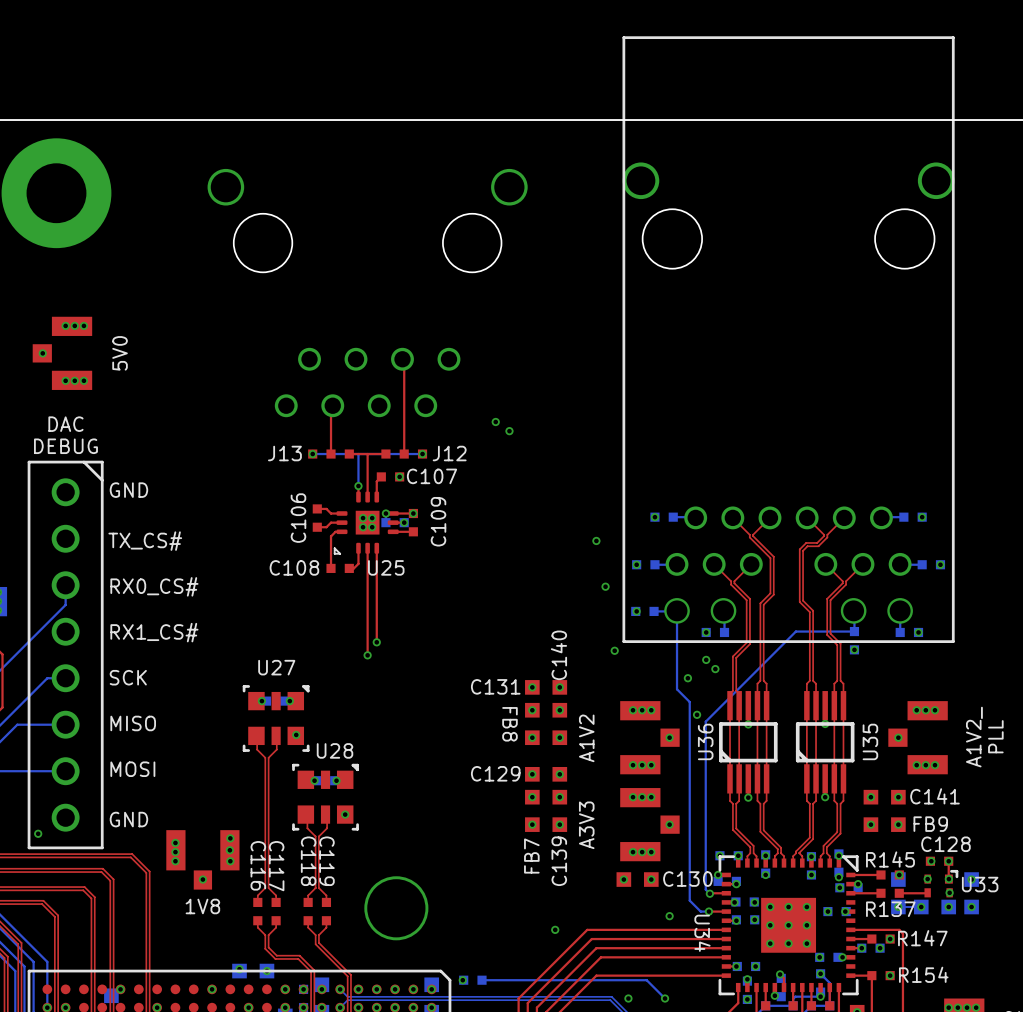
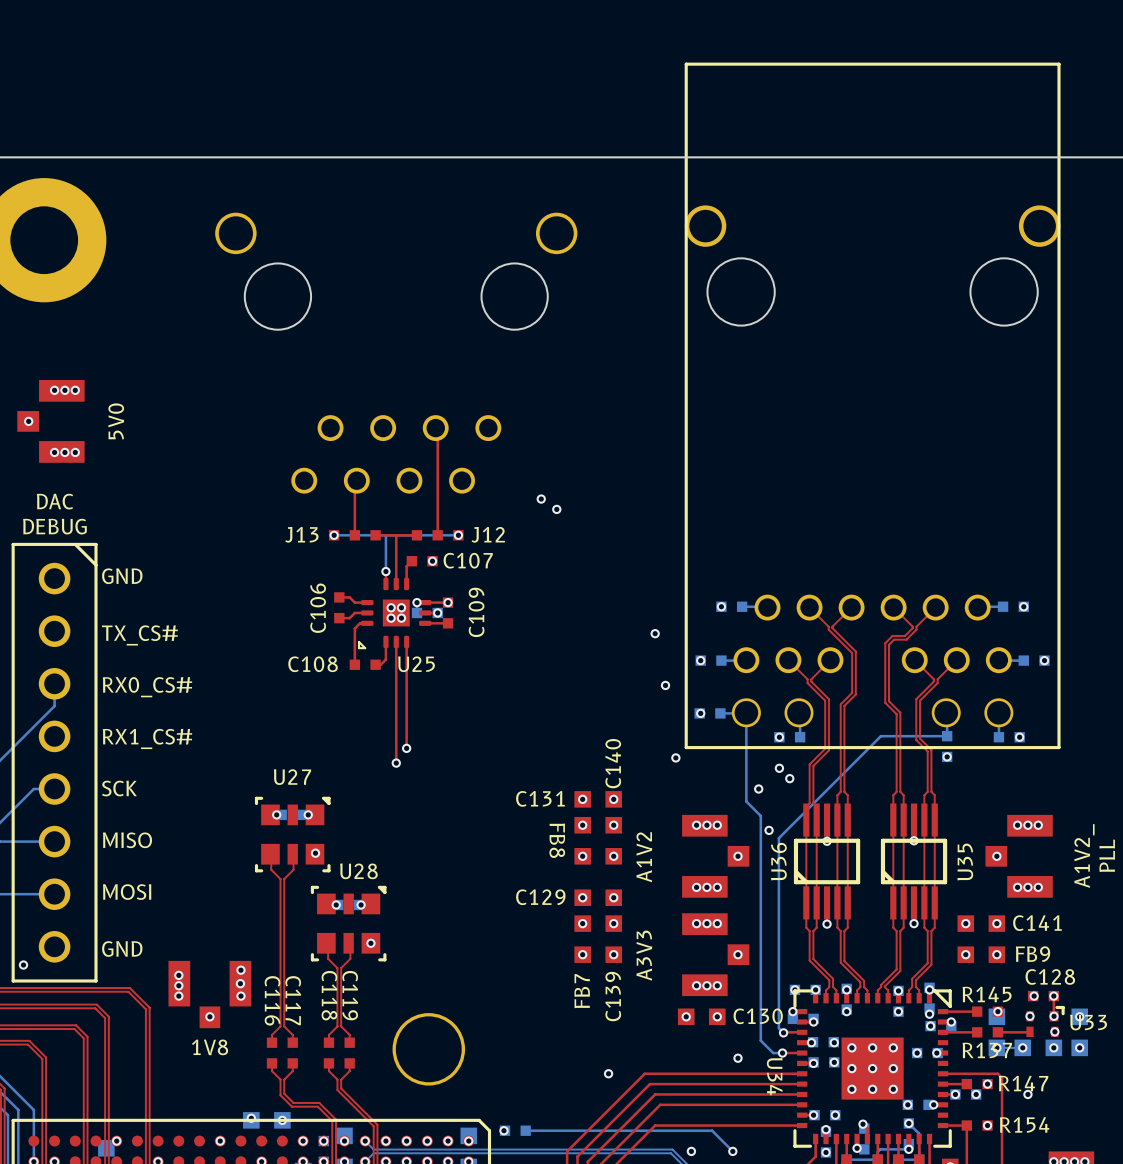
via: none -> (1027, 1094)

